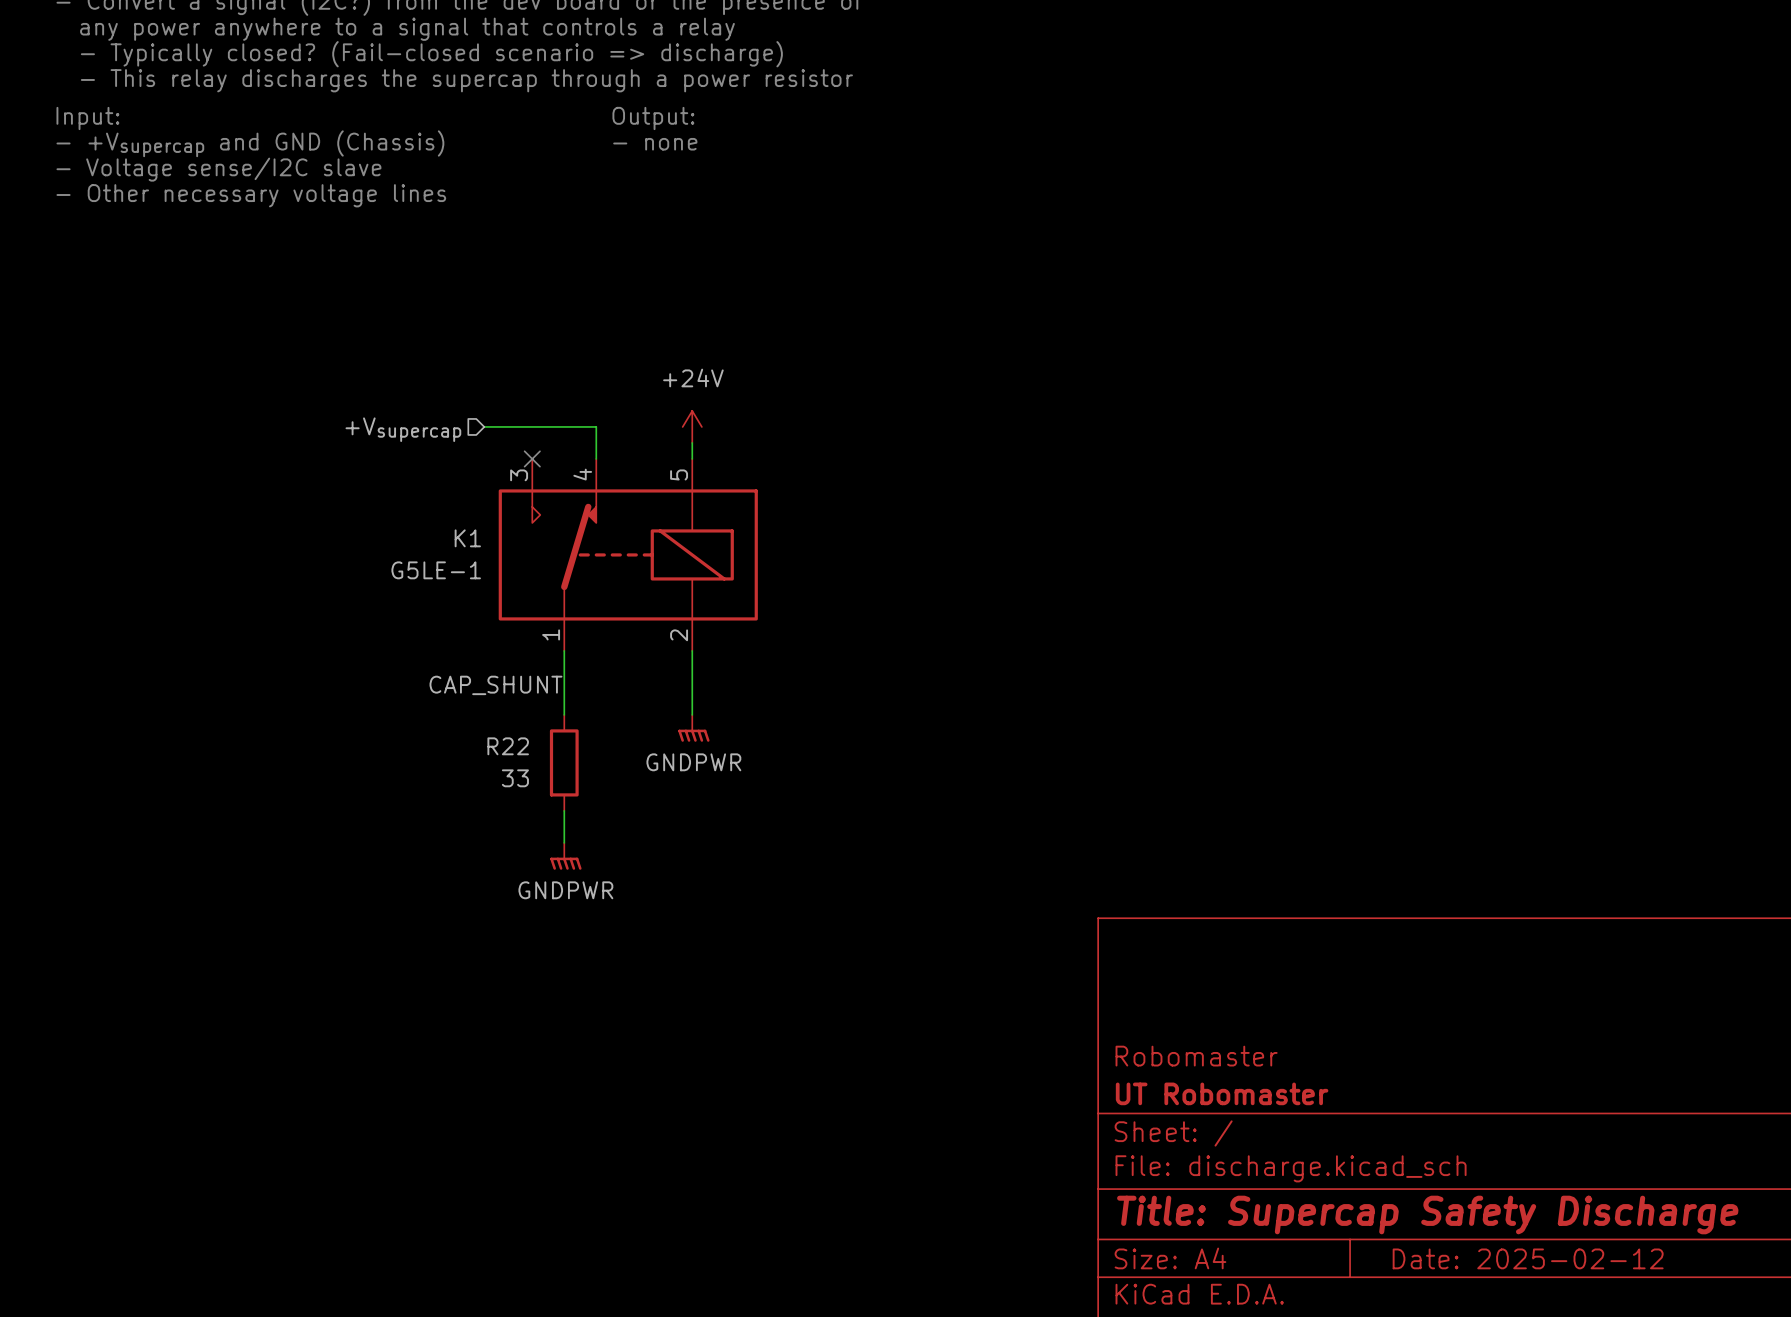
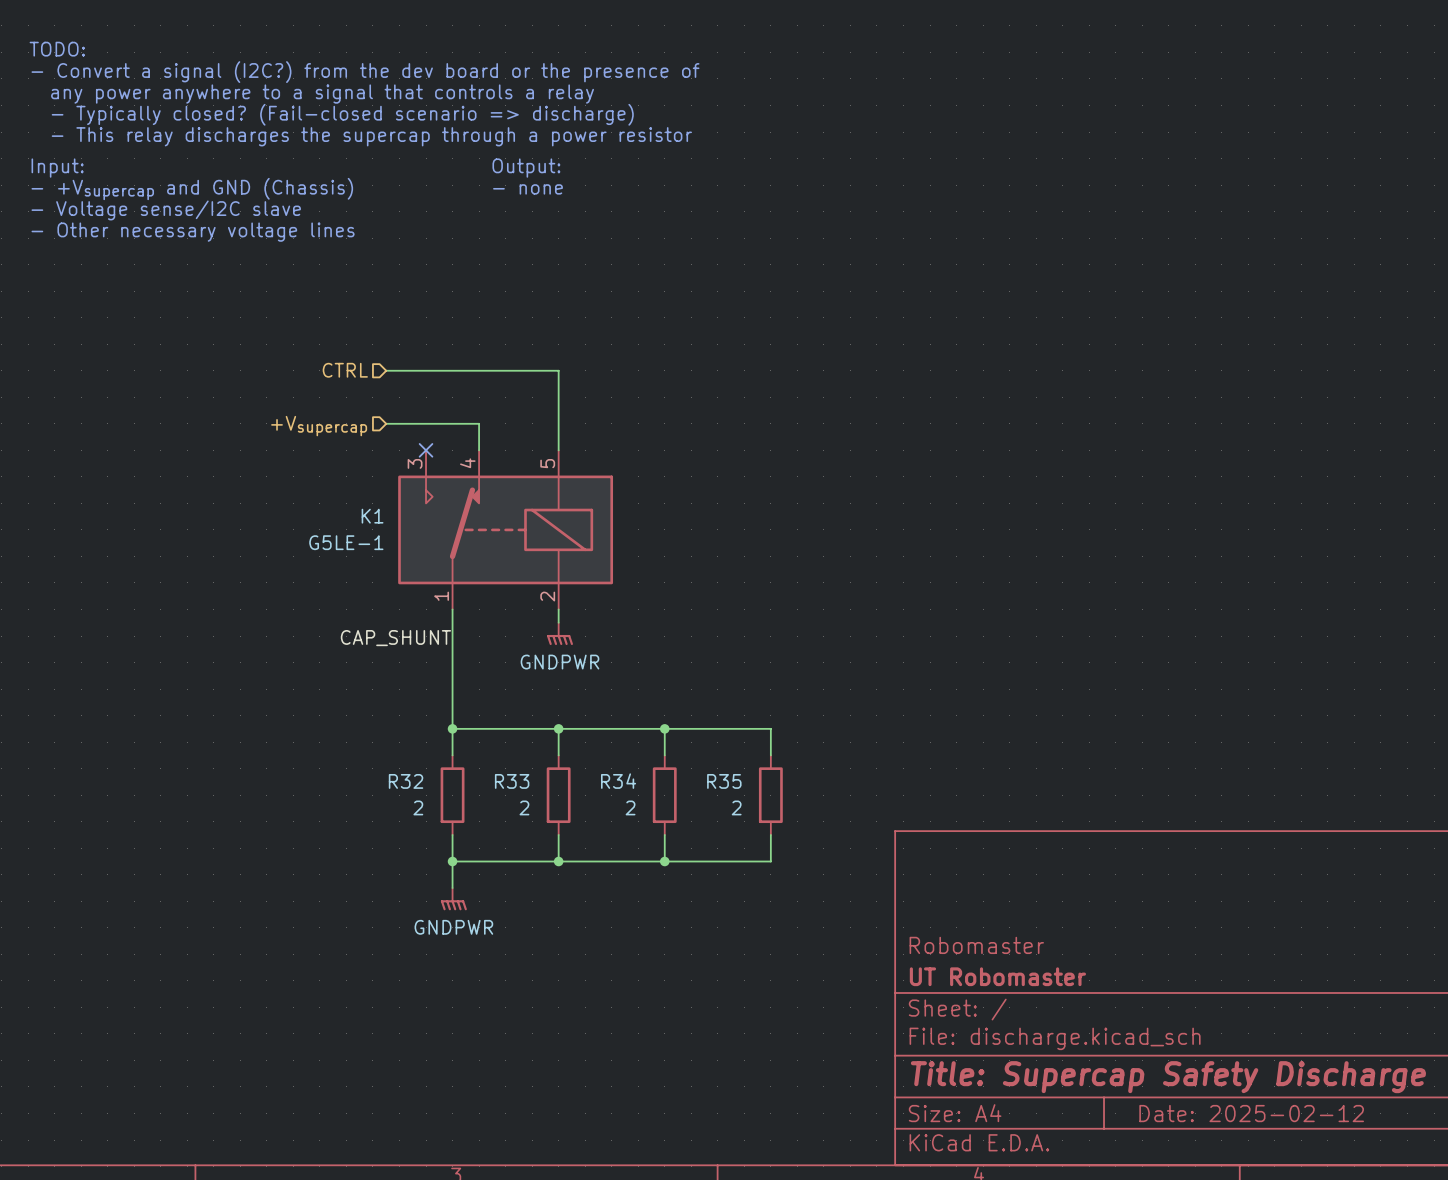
hierarchical label: none -> CTRL (345, 370)
wire: none -> (386, 370) (558, 370) (558, 437)
power symbol: +24V (692, 426) -> none
wire: (692, 666) (692, 714) -> none
wire: none -> (452, 662) (452, 742)
power symbol position: GNDPWR (693, 728) -> GNDPWR (559, 633)
R22: 33 (564, 762) -> none
wire: none -> (452, 728) (770, 728) (770, 755)
junction: none -> (452, 728)
wire: none -> (558, 728) (558, 755)
junction: none -> (558, 728)
wire: none -> (664, 728) (664, 755)
junction: none -> (664, 728)
power symbol: GNDPWR (565, 856) -> none
R32: none -> 2 (452, 795)
R33: none -> 2 (558, 795)
R34: none -> 2 (664, 795)
R35: none -> 2 (770, 795)
wire: none -> (452, 834) (452, 888)
wire: none -> (558, 834) (558, 861)
wire: none -> (664, 834) (664, 861)
wire: none -> (770, 834) (770, 861) (452, 861)
junction: none -> (452, 861)
junction: none -> (558, 861)
junction: none -> (664, 861)
power symbol: none -> GNDPWR (453, 899)

